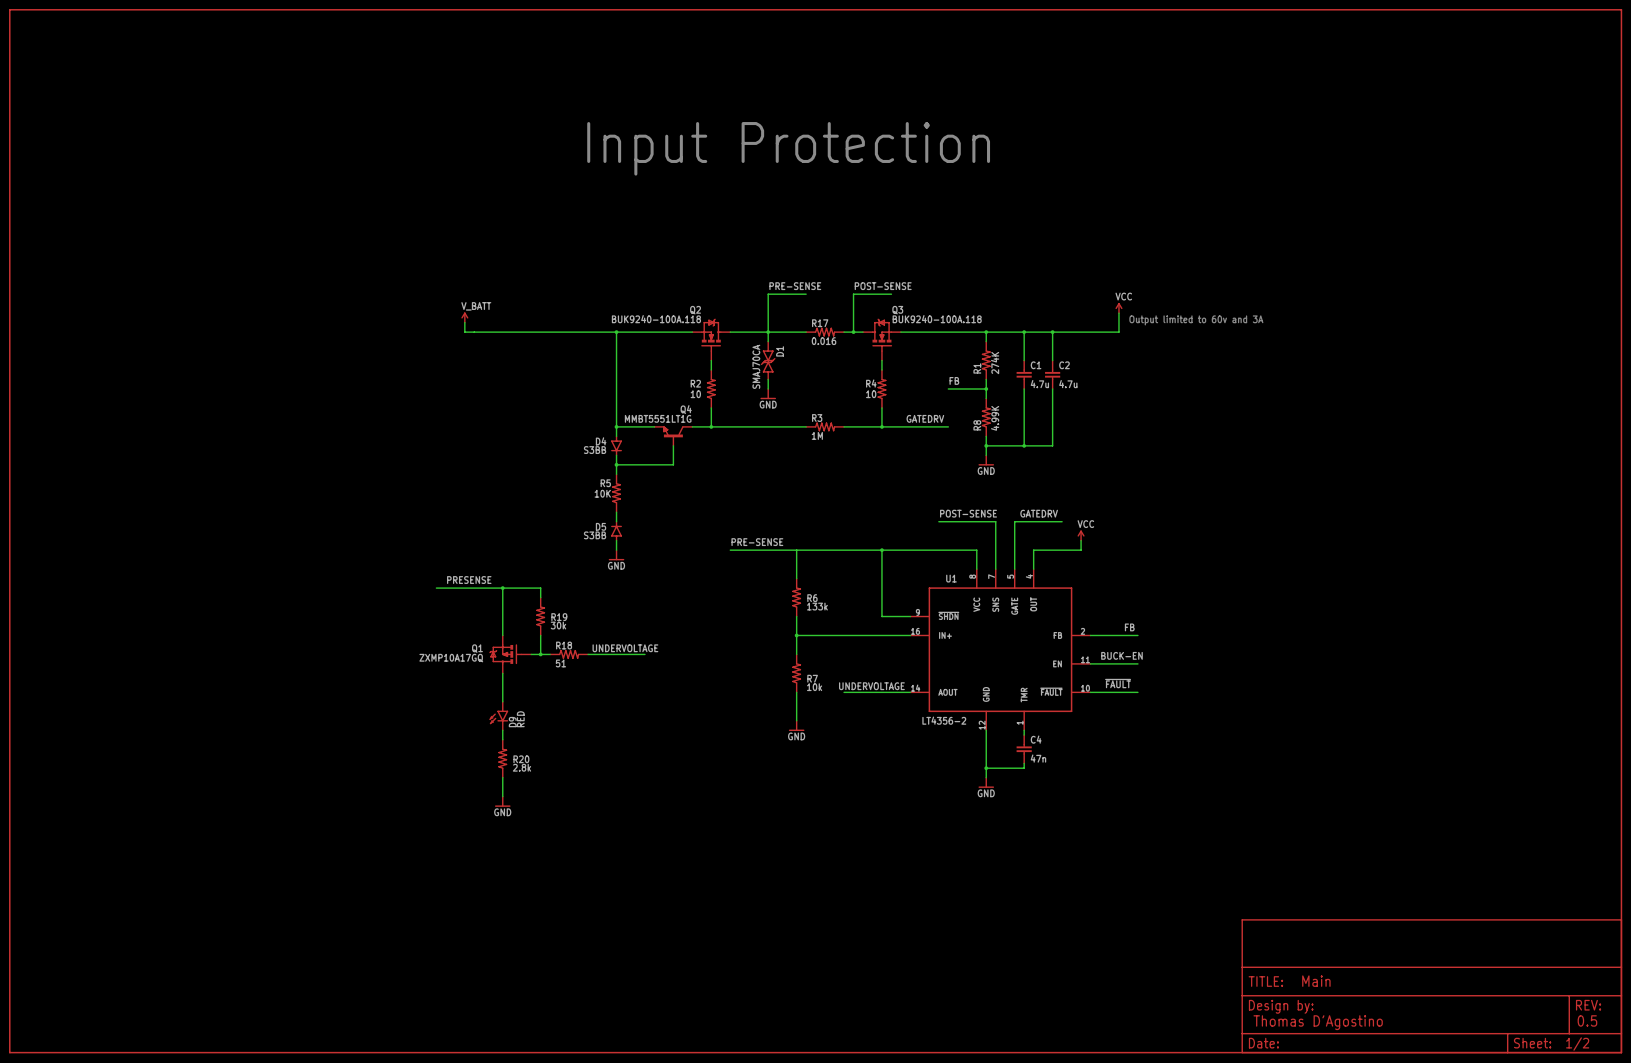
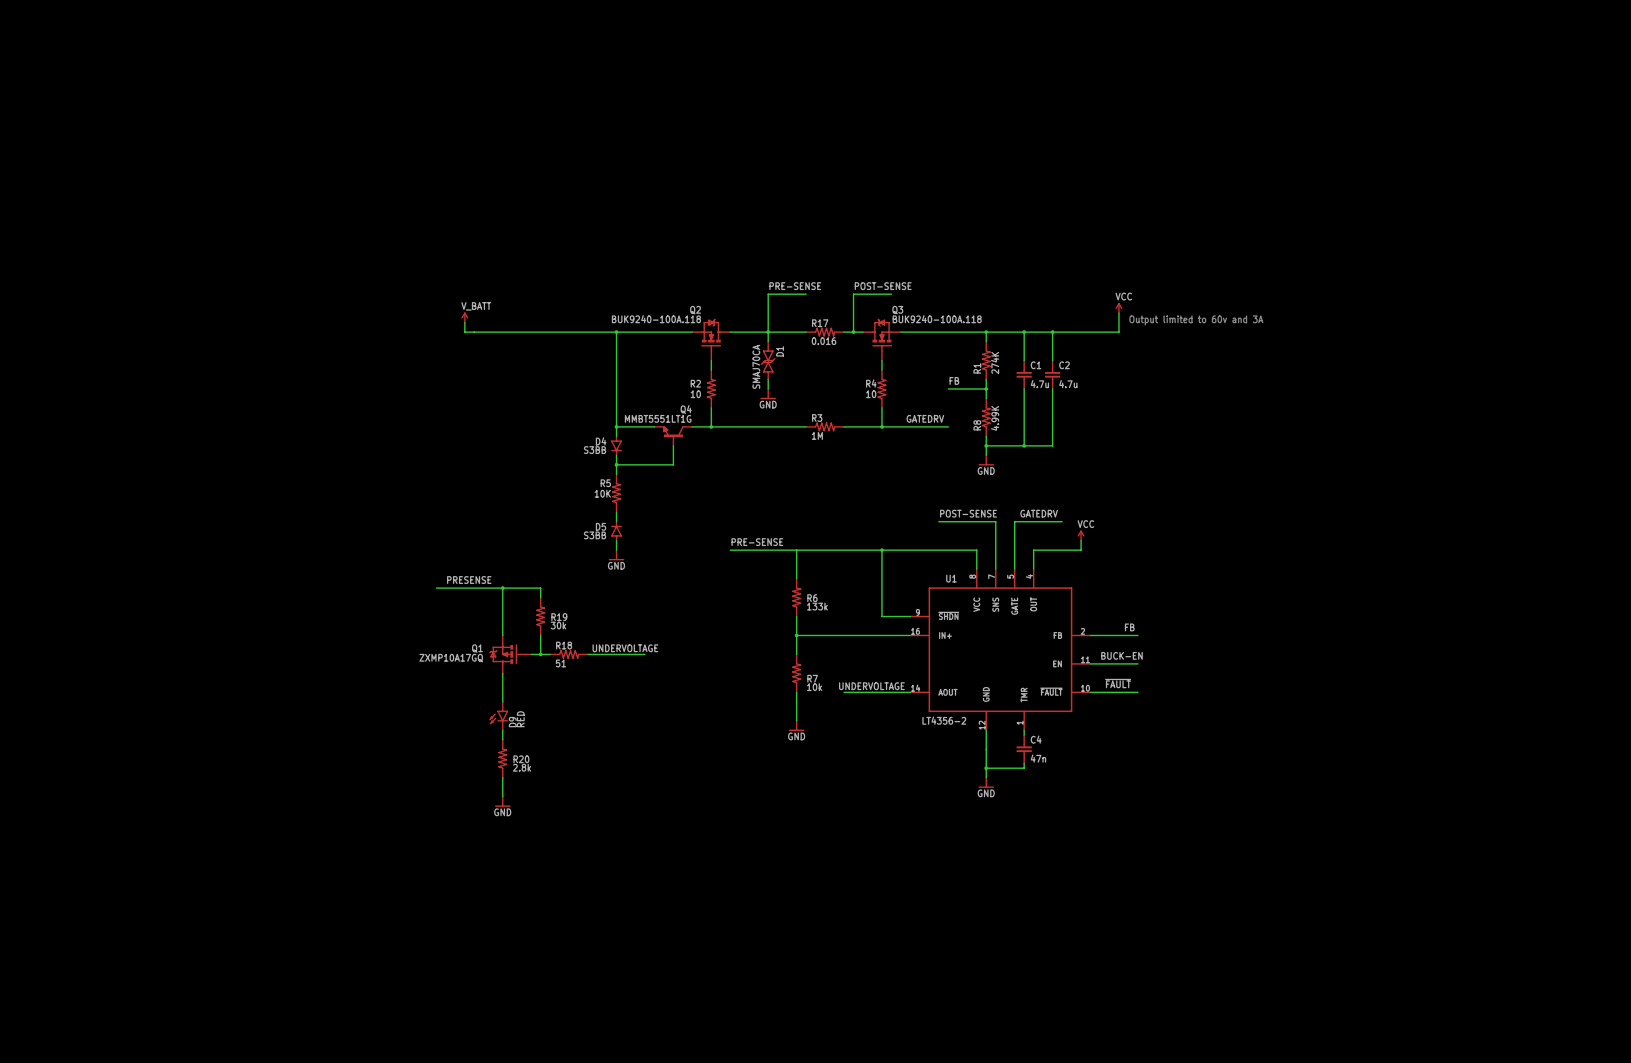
text: Input Protection (788, 148) -> none
part: (815, 531) -> none
part: (1431, 986) -> none

